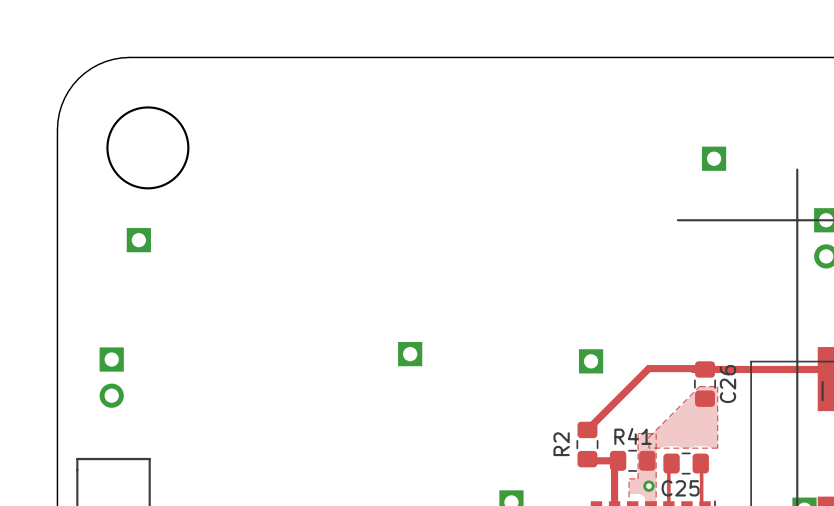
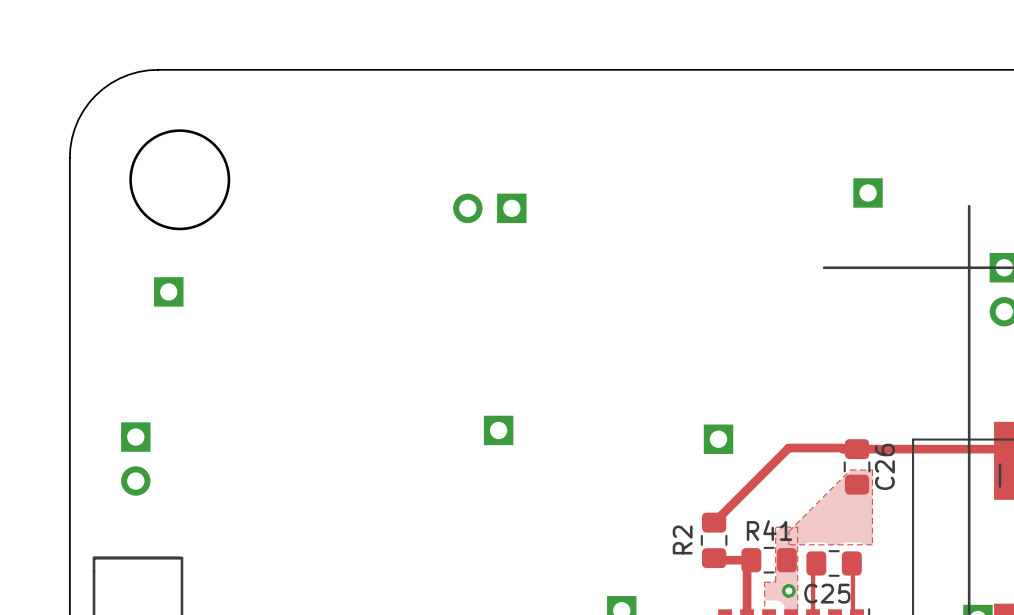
part: none -> (489, 208)

